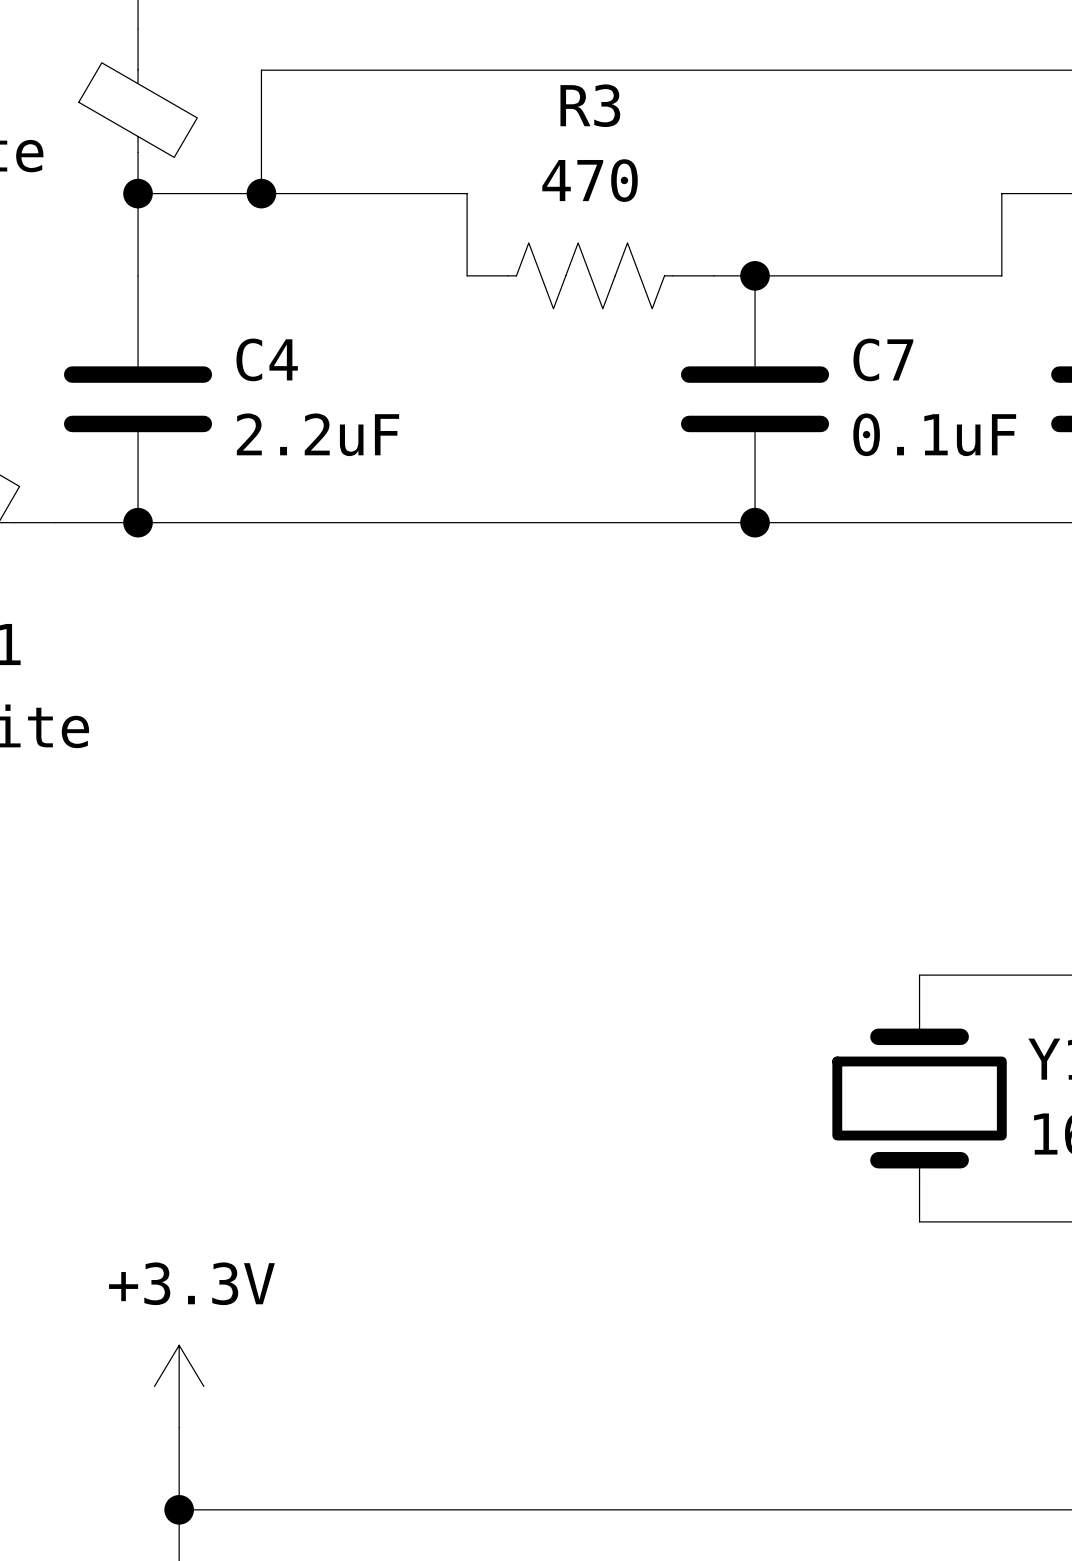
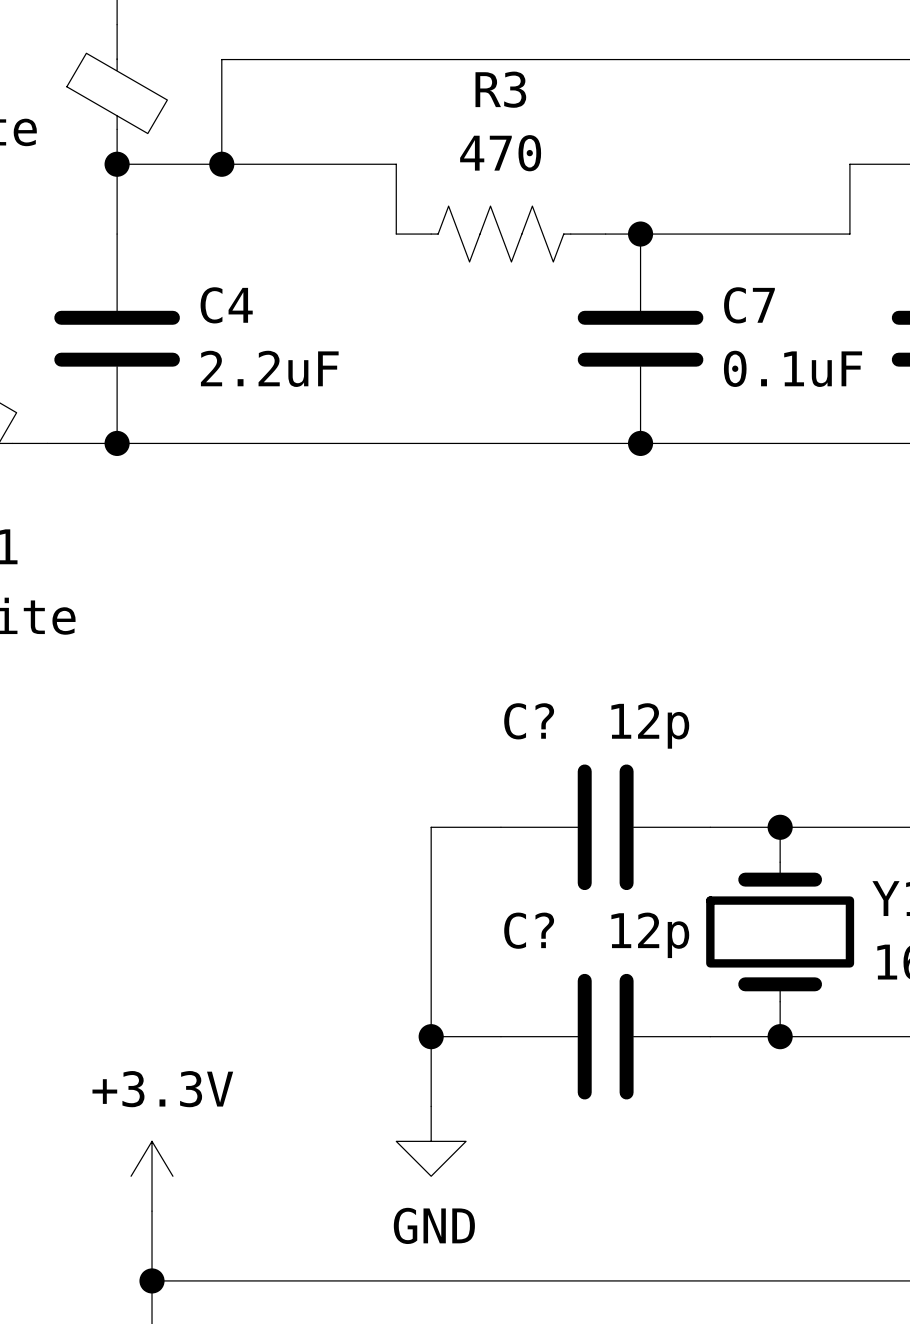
wire: none -> (500, 827) (431, 827) (431, 1106)
C?: none -> 12p (605, 827)
wire: none -> (710, 827) (780, 827)
junction: none -> (780, 827)
wire: none -> (431, 1036) (500, 1036)
junction: none -> (431, 1036)
C?: none -> 12p (605, 1036)
wire: none -> (710, 1036) (780, 1036)
junction: none -> (780, 1036)
power symbol: none -> GND (431, 1141)

